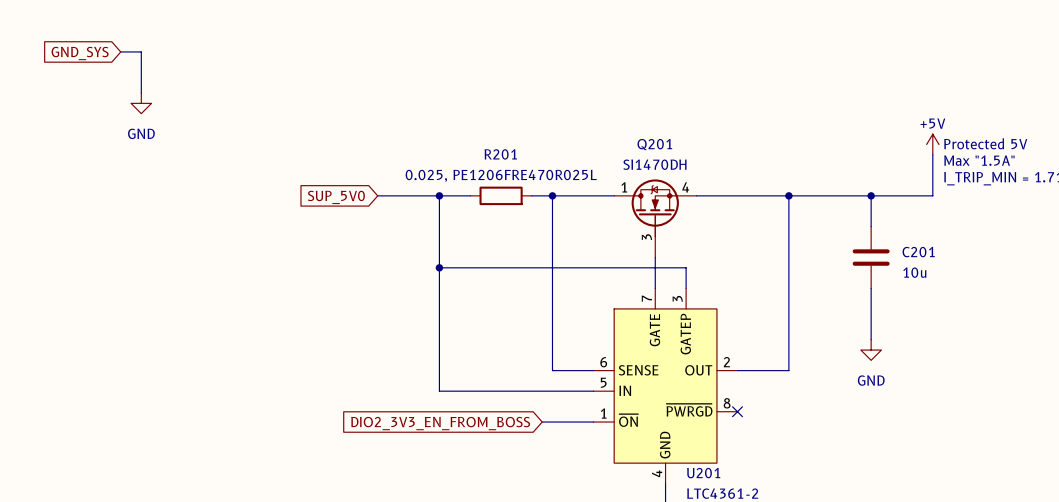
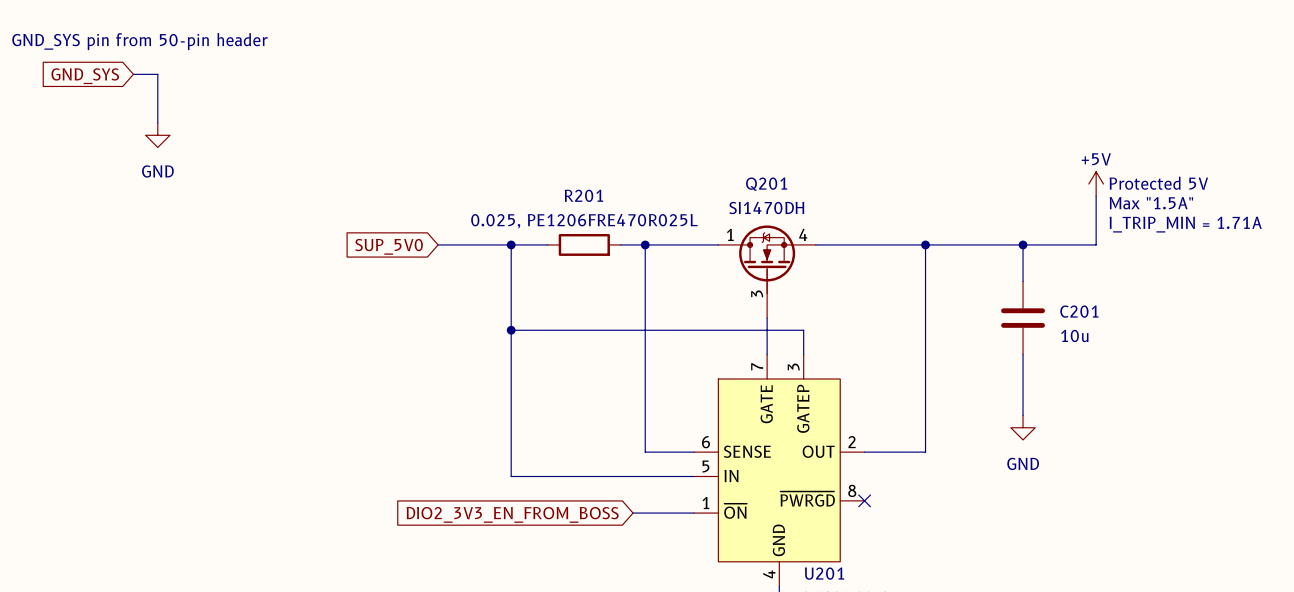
text: none -> GND_SYS pin from 50-pin header (140, 41)

